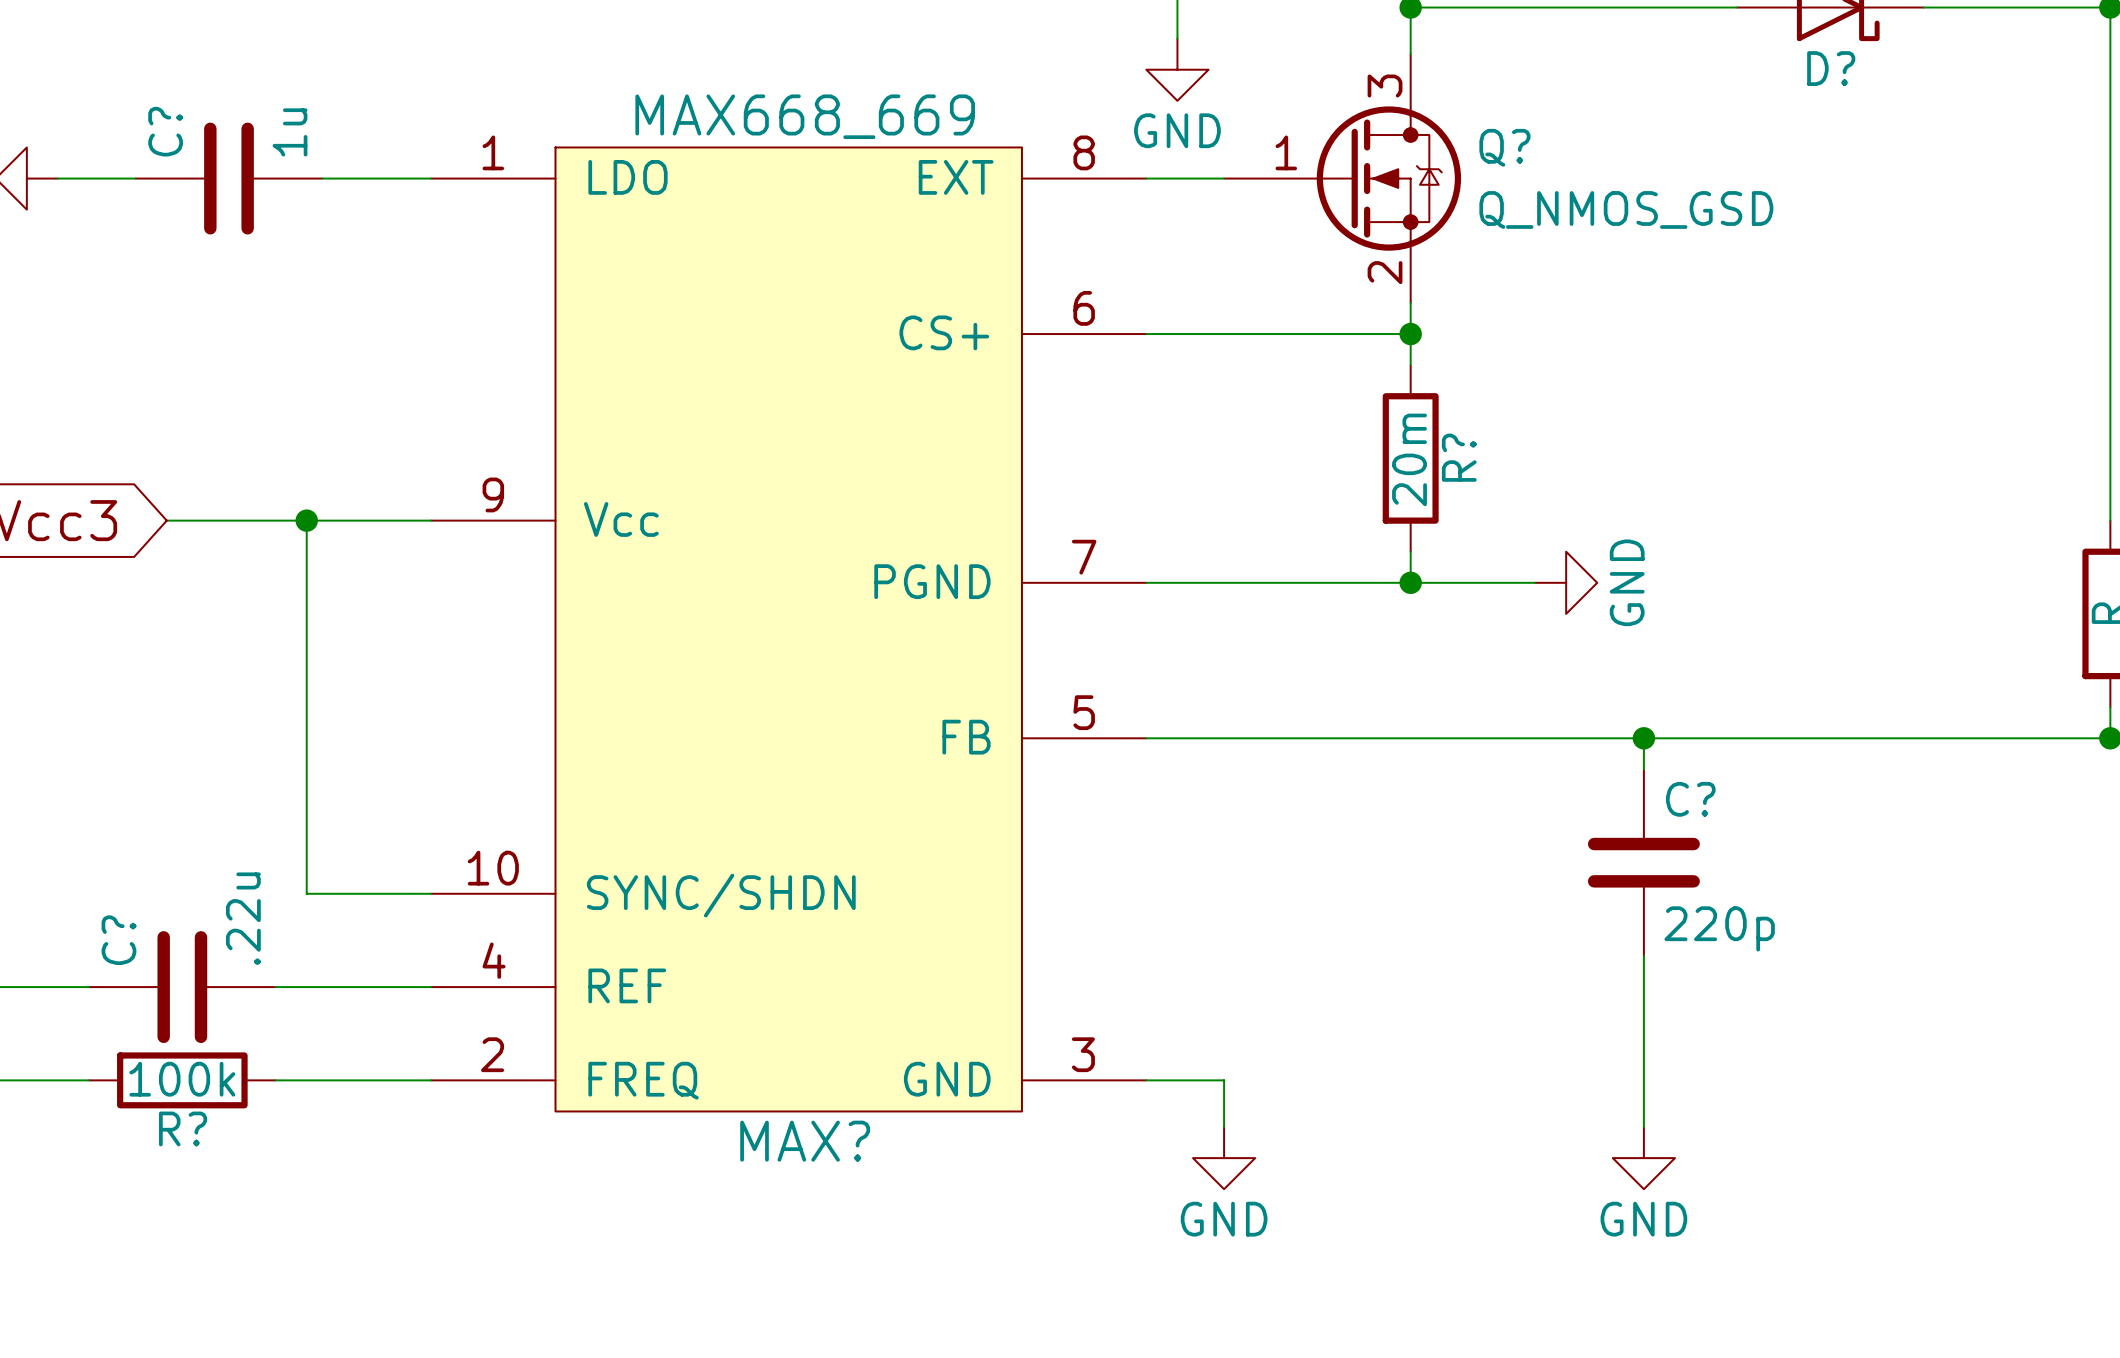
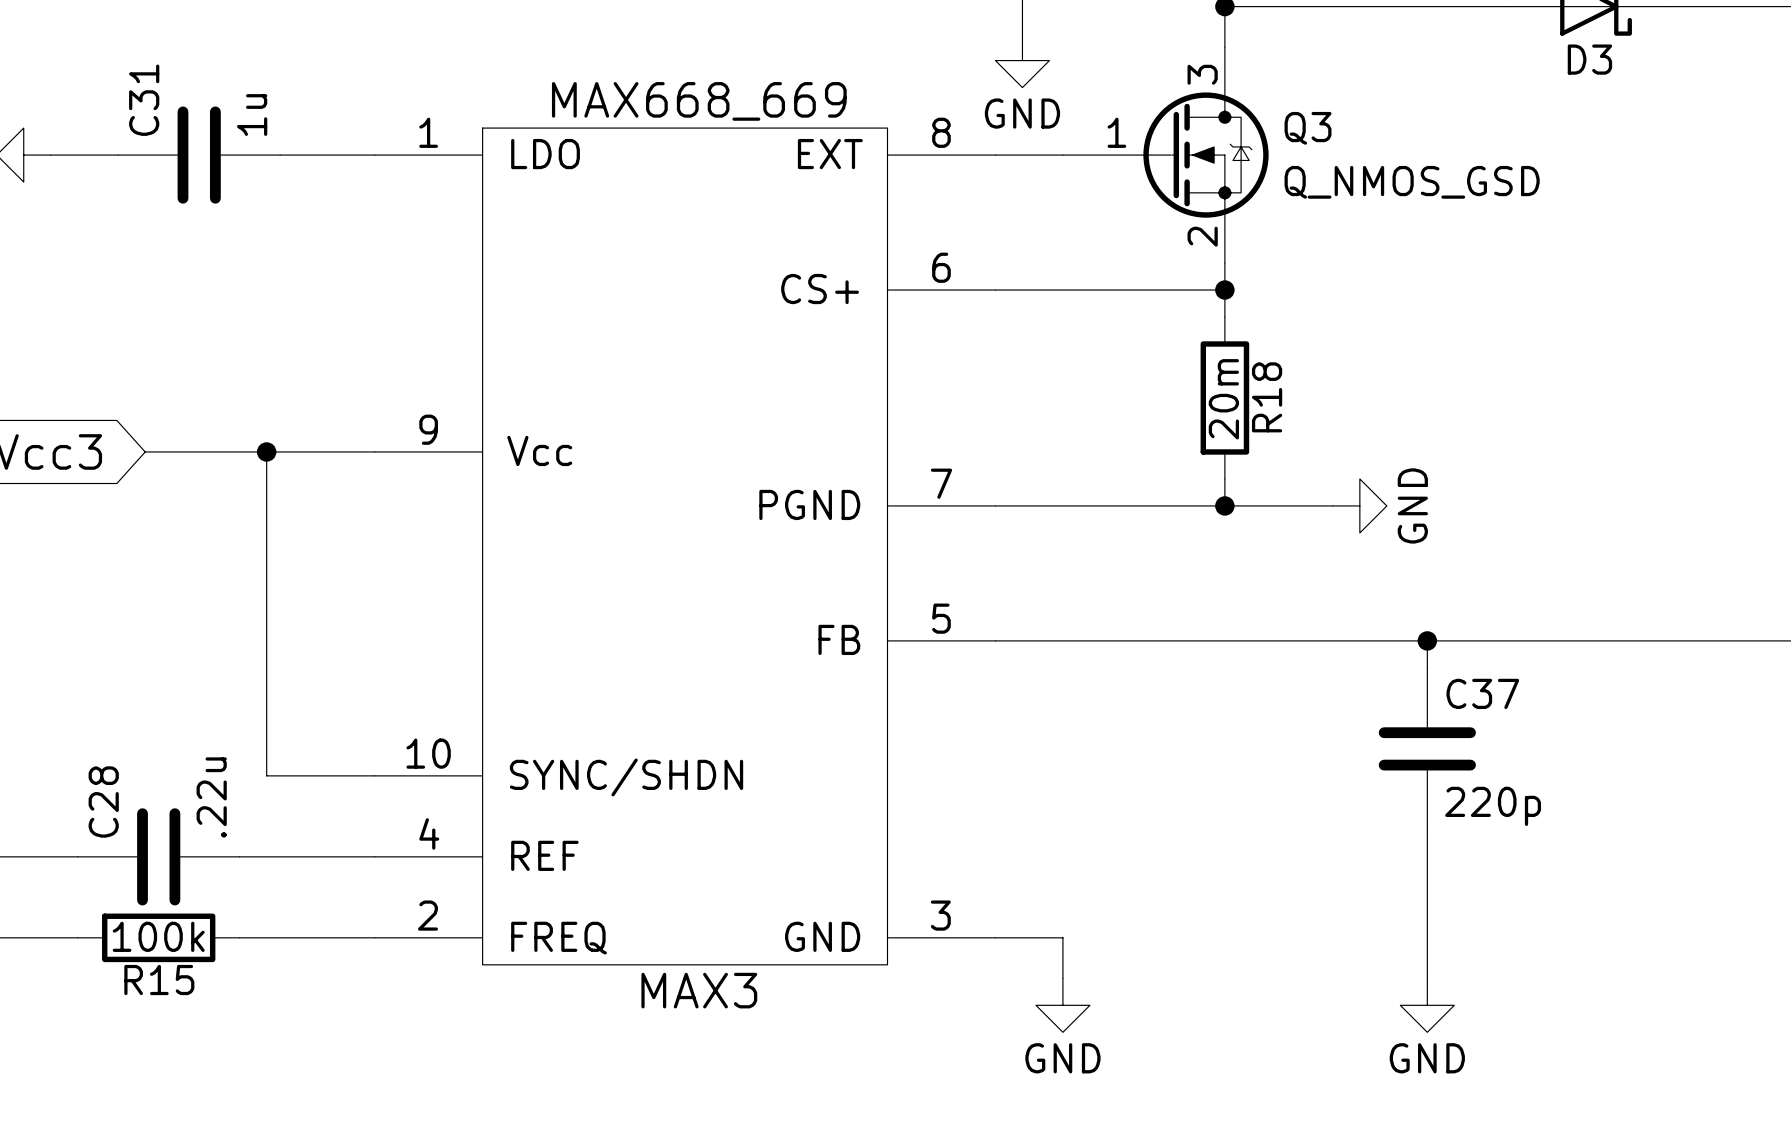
D? name: D? (1831, 68) -> D3 (1589, 59)
C? name: C? (165, 131) -> C31 (144, 100)
Q? name: Q? (1504, 147) -> Q3 (1308, 128)
R? name: R? (1459, 457) -> R18 (1267, 397)
C? name: C? (1690, 799) -> C37 (1482, 693)
C? name: C? (118, 940) -> C28 (103, 802)
R? name: R? (183, 1128) -> R15 (159, 980)
MAX? name: MAX? (805, 1141) -> MAX3 (699, 990)

